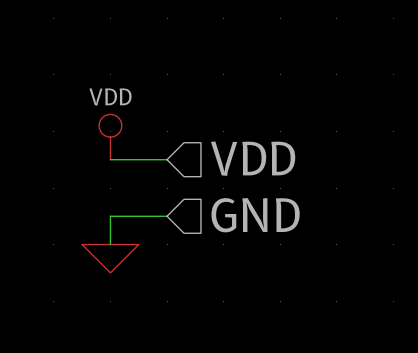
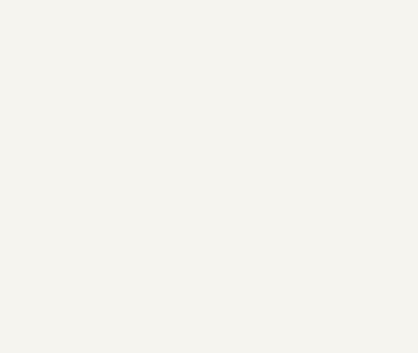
power symbol: VDD (110, 137) -> none
hierarchical label: VDD (253, 158) -> none
wire: (110, 159) (167, 159) -> none
hierarchical label: GND (255, 215) -> none
wire: (167, 216) (110, 216) (110, 244) -> none
power symbol: (110, 258) -> none

